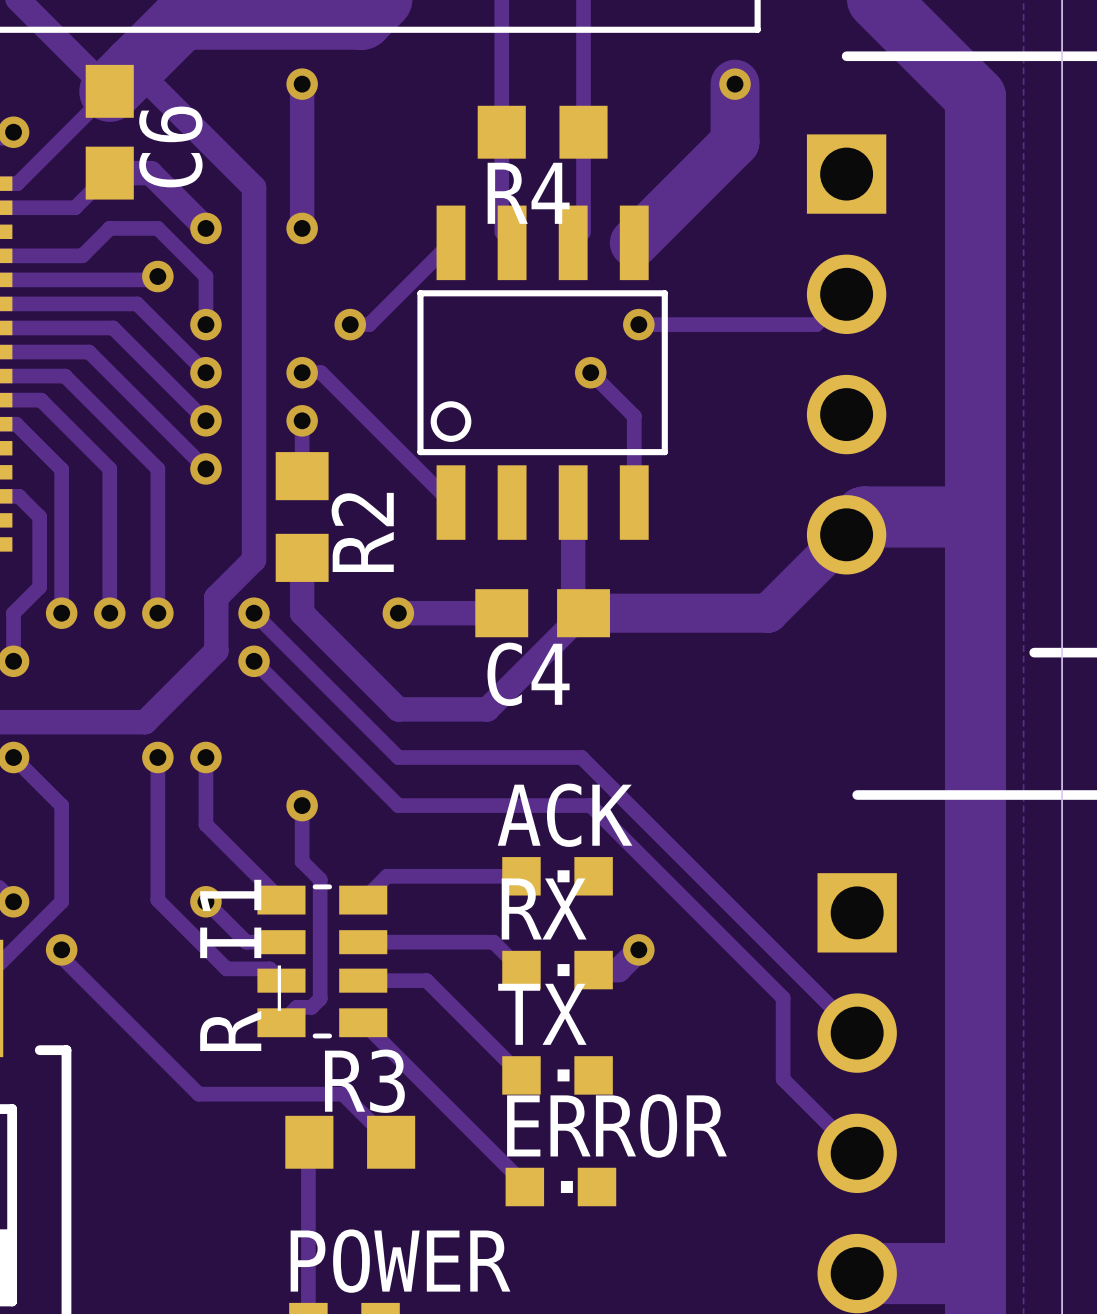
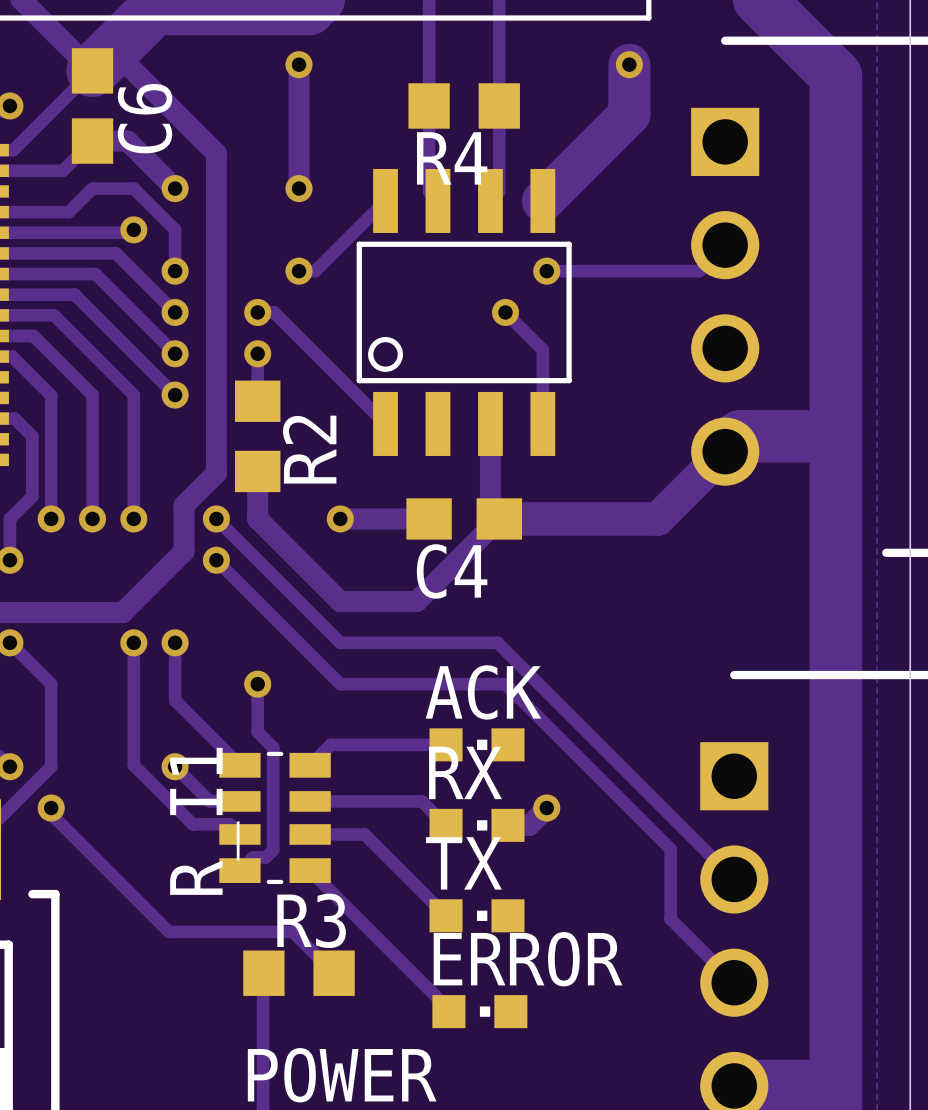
track: (302, 84) (302, 228) -> (299, 64) (299, 188)
via position: (302, 84) -> (299, 64)
via position: (302, 228) -> (299, 188)

